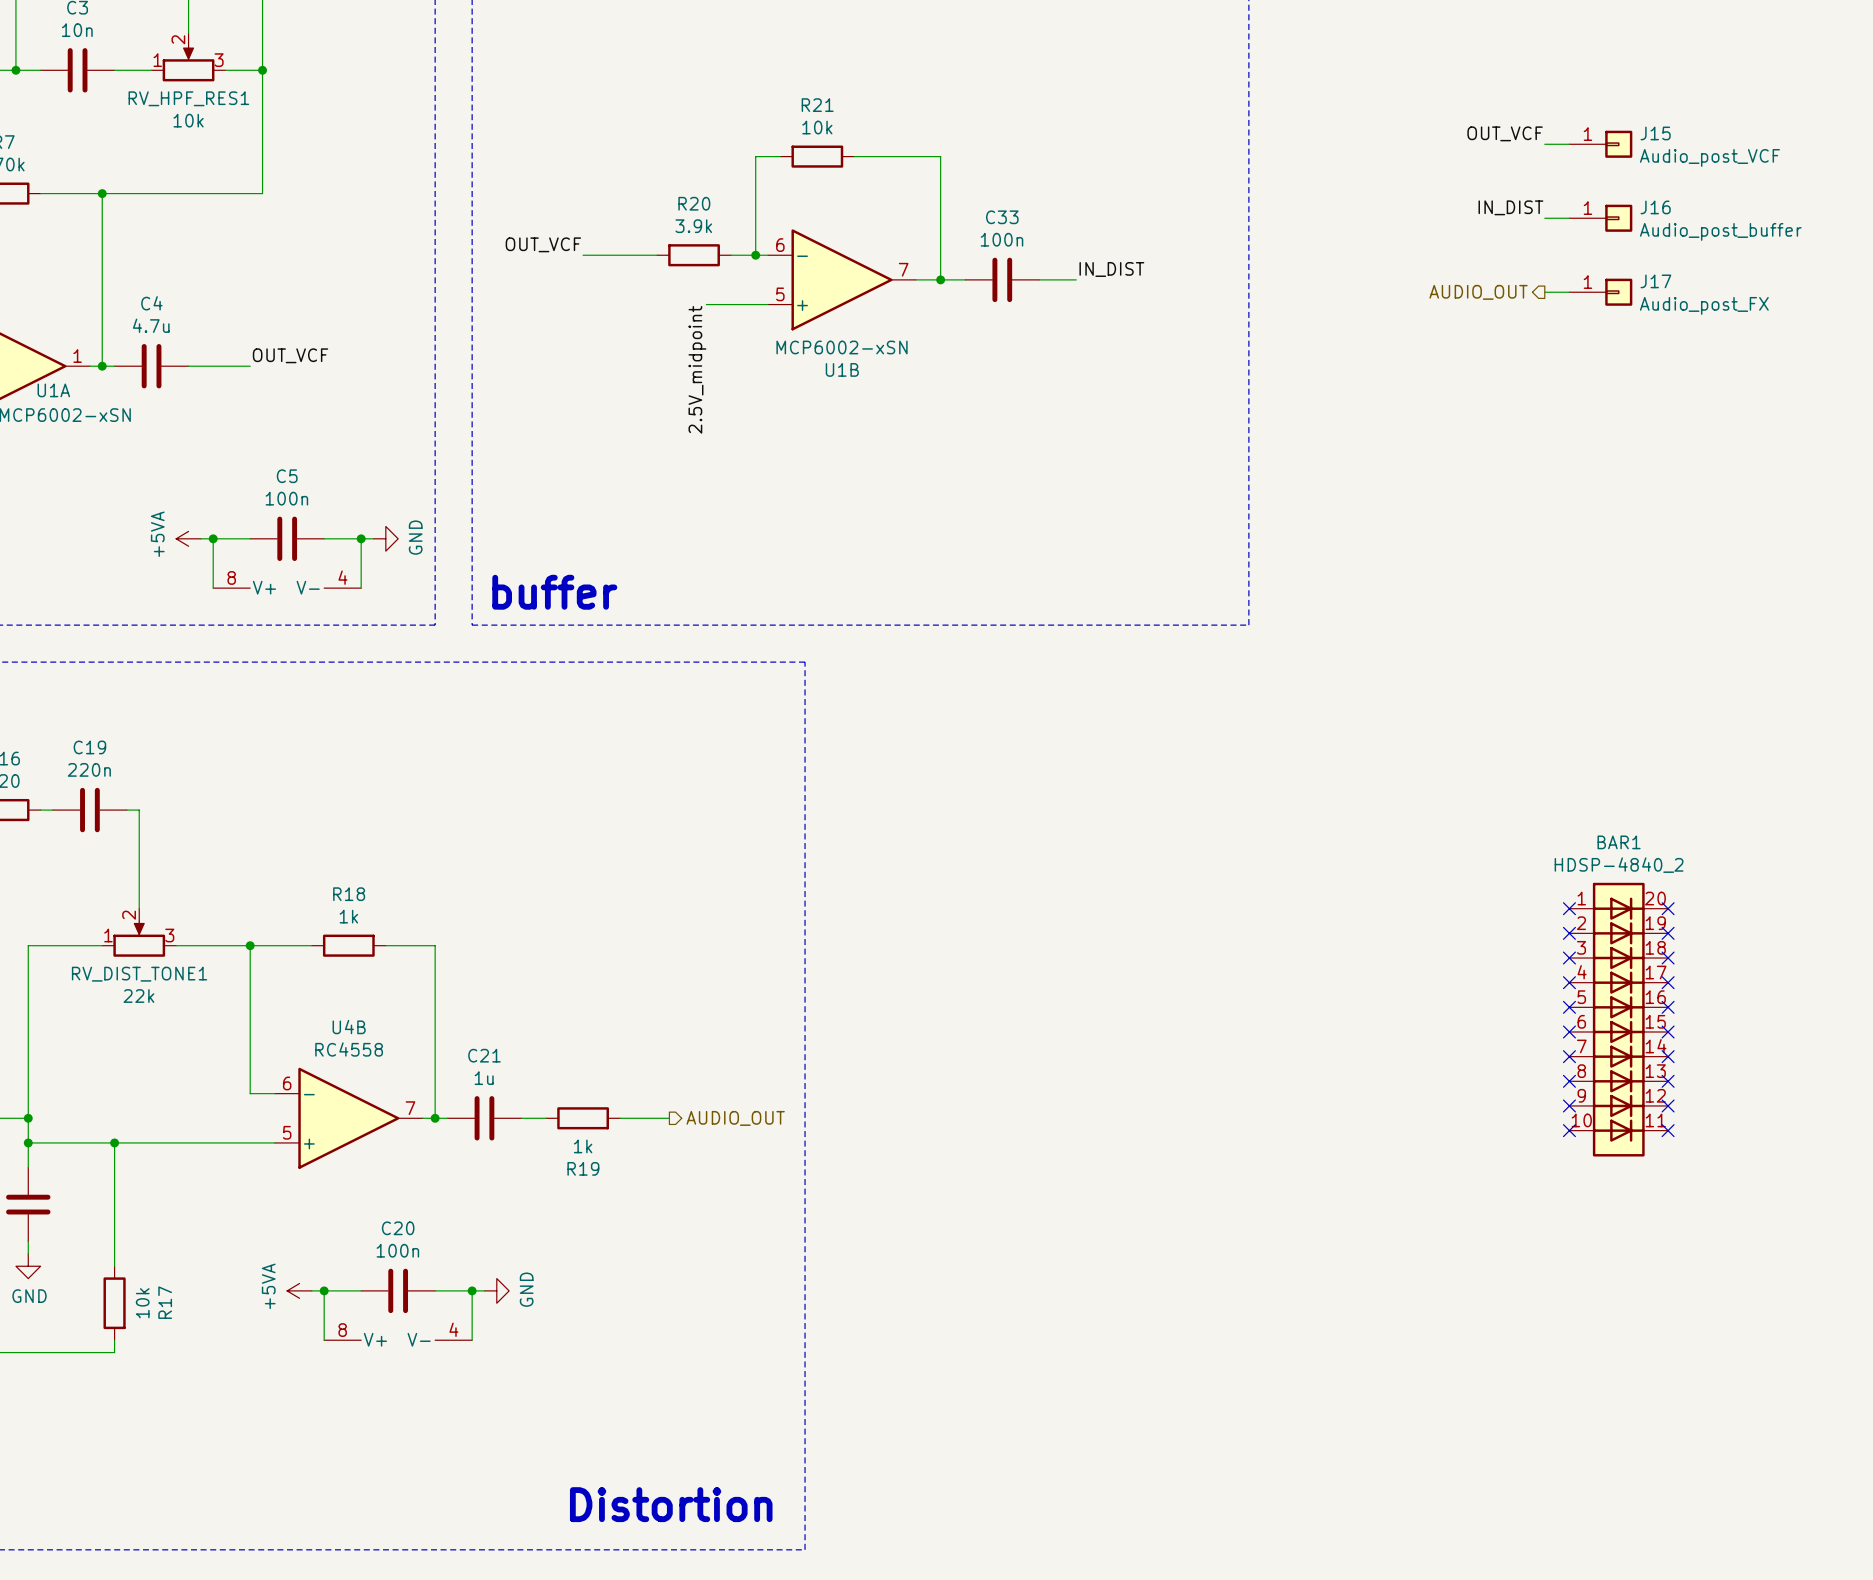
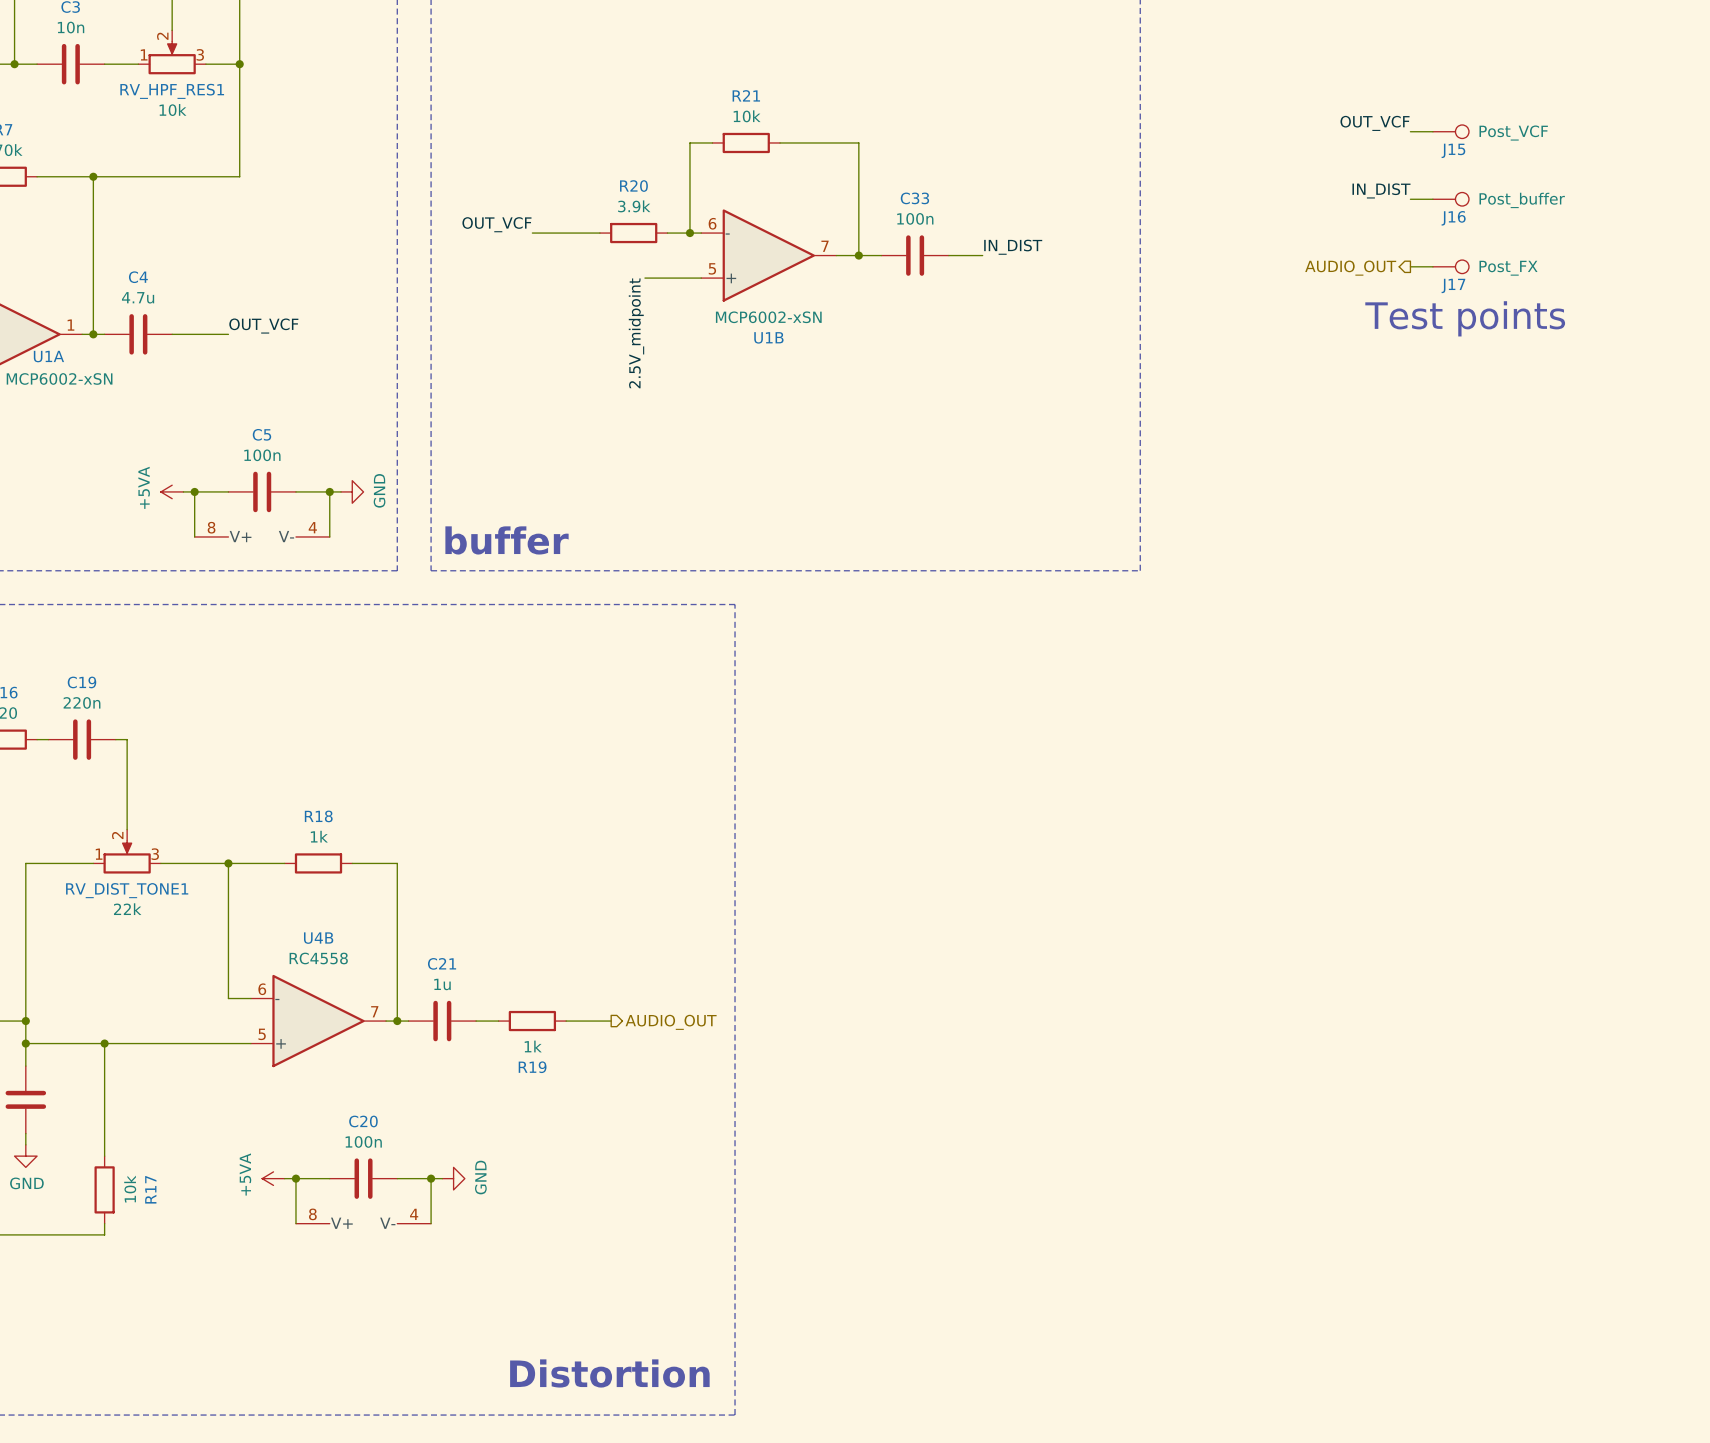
J15 symbol: [1569, 130, 1633, 158] -> [1432, 124, 1469, 139]
J15 name position: J15 (1655, 133) -> J15 (1453, 150)
J15 value: Audio_post_VCF (1709, 157) -> Post_VCF (1513, 133)
J16 symbol: [1569, 204, 1633, 232] -> [1432, 192, 1469, 207]
J16 name position: J16 (1655, 207) -> J16 (1453, 218)
J16 value: Audio_post_buffer (1720, 231) -> Post_buffer (1522, 200)
J17 symbol: [1569, 278, 1633, 306] -> [1432, 260, 1469, 274]
J17 name position: J17 (1655, 281) -> J17 (1453, 285)
J17 value: Audio_post_FX (1704, 305) -> Post_FX (1508, 268)
text: none -> Test points (1465, 318)
no-connect mark: (1569, 908) -> none
no-connect mark: (1668, 908) -> none
no-connect mark: (1569, 933) -> none
no-connect mark: (1668, 933) -> none
no-connect mark: (1569, 958) -> none
no-connect mark: (1668, 958) -> none
no-connect mark: (1569, 982) -> none
no-connect mark: (1668, 982) -> none
no-connect mark: (1569, 1007) -> none
no-connect mark: (1668, 1007) -> none
BAR1: HDSP-4840_2 (1618, 1019) -> none
no-connect mark: (1569, 1031) -> none
no-connect mark: (1668, 1031) -> none
no-connect mark: (1569, 1056) -> none
no-connect mark: (1668, 1056) -> none
no-connect mark: (1569, 1081) -> none
no-connect mark: (1668, 1081) -> none
no-connect mark: (1569, 1105) -> none
no-connect mark: (1668, 1105) -> none
no-connect mark: (1569, 1130) -> none
no-connect mark: (1668, 1130) -> none

